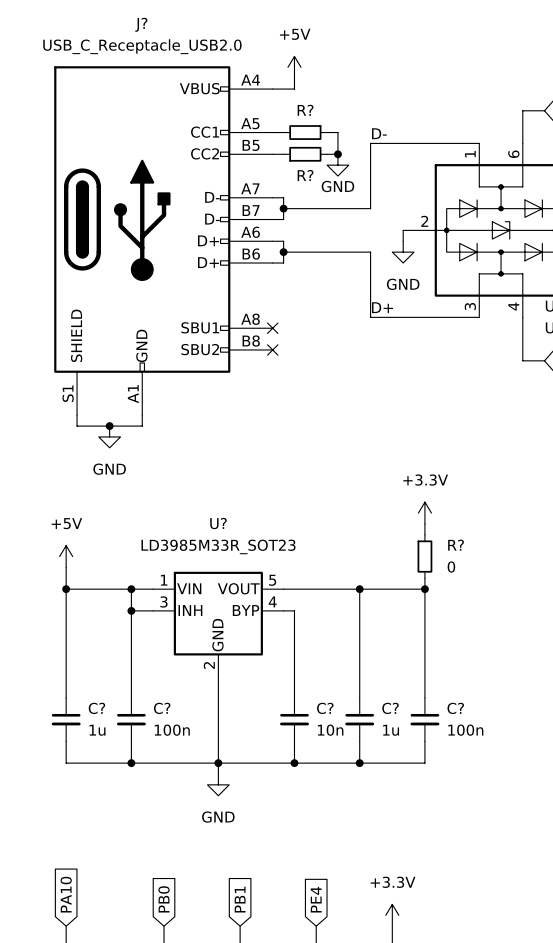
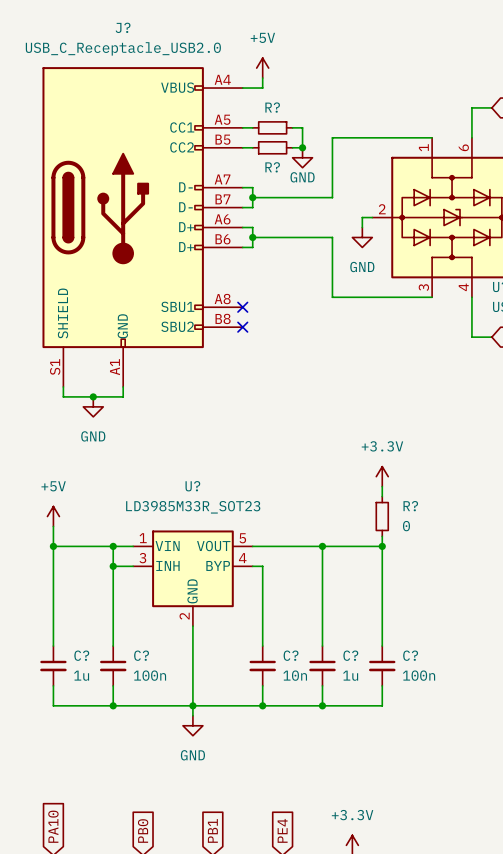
label: D- (379, 133) -> none
label: D+ (382, 307) -> none

